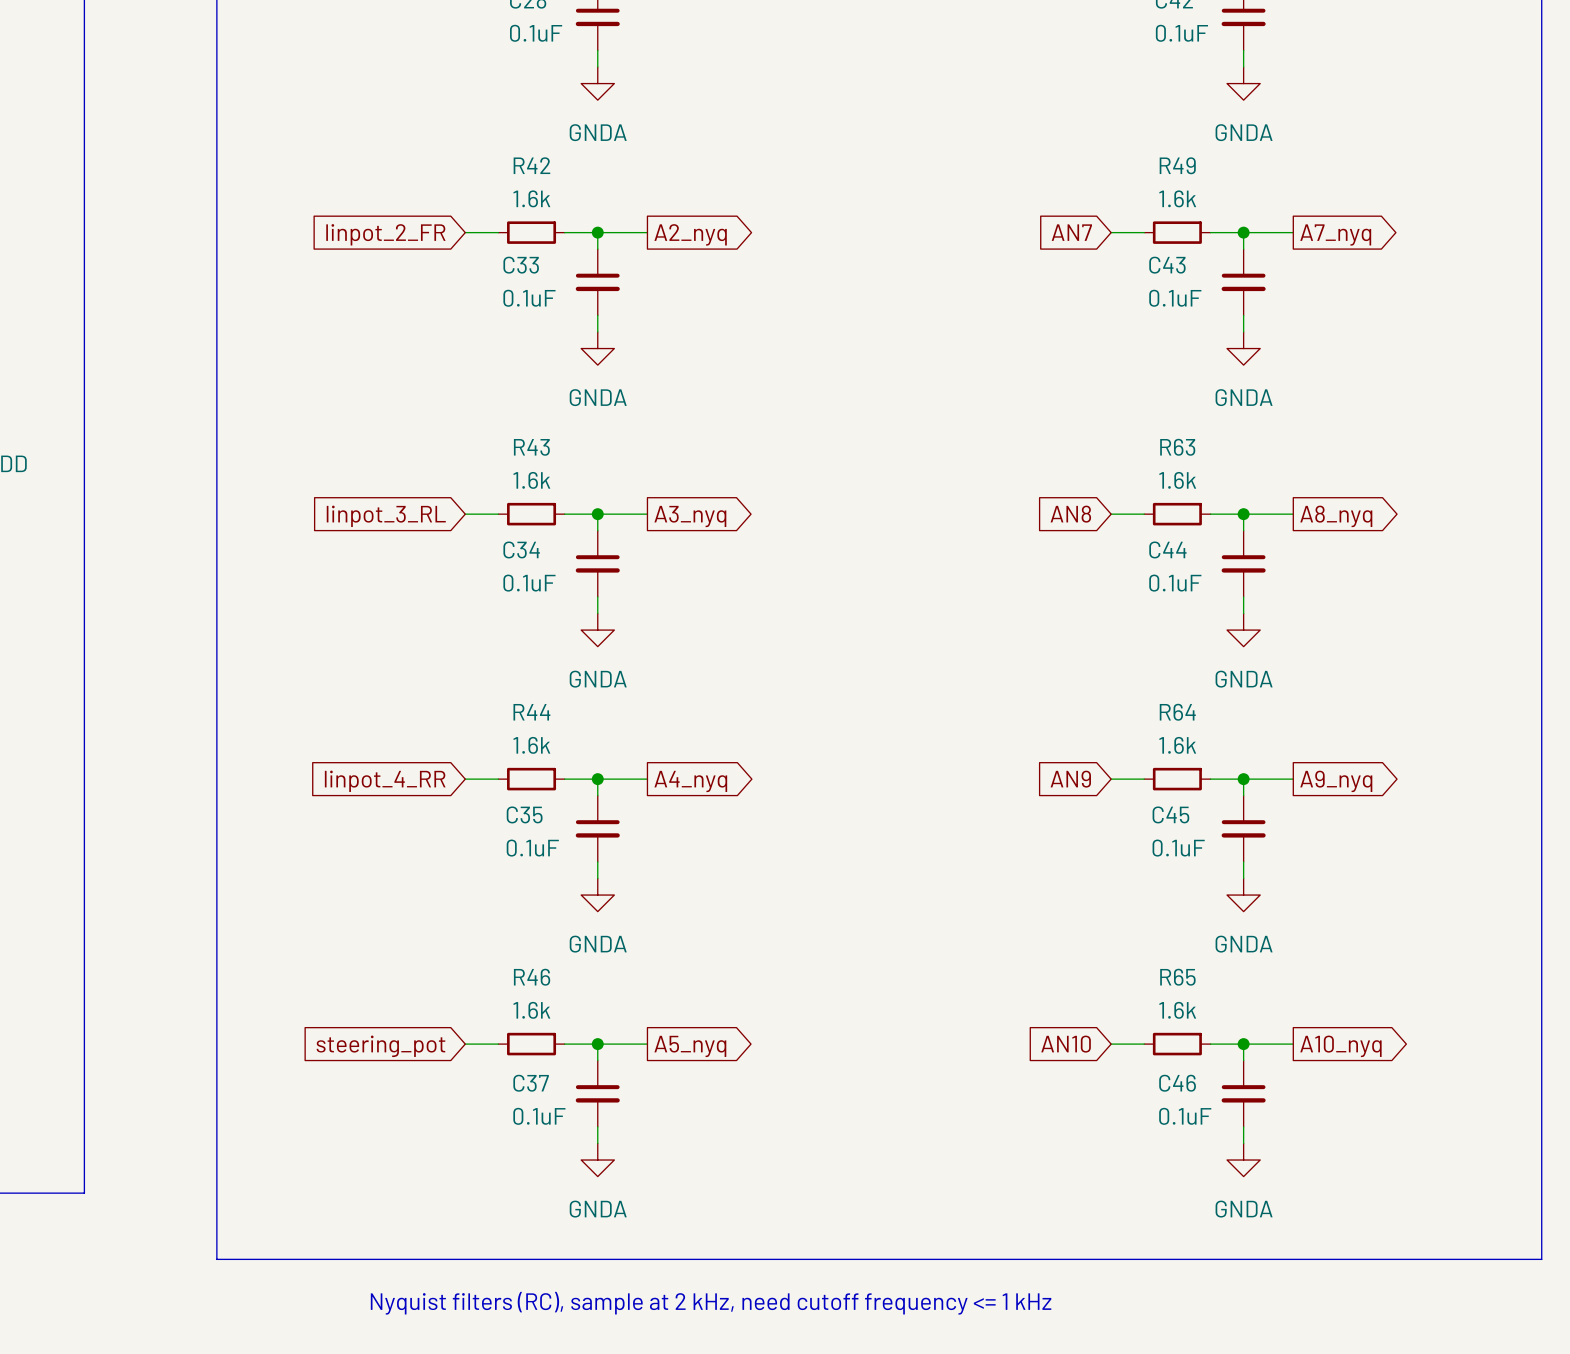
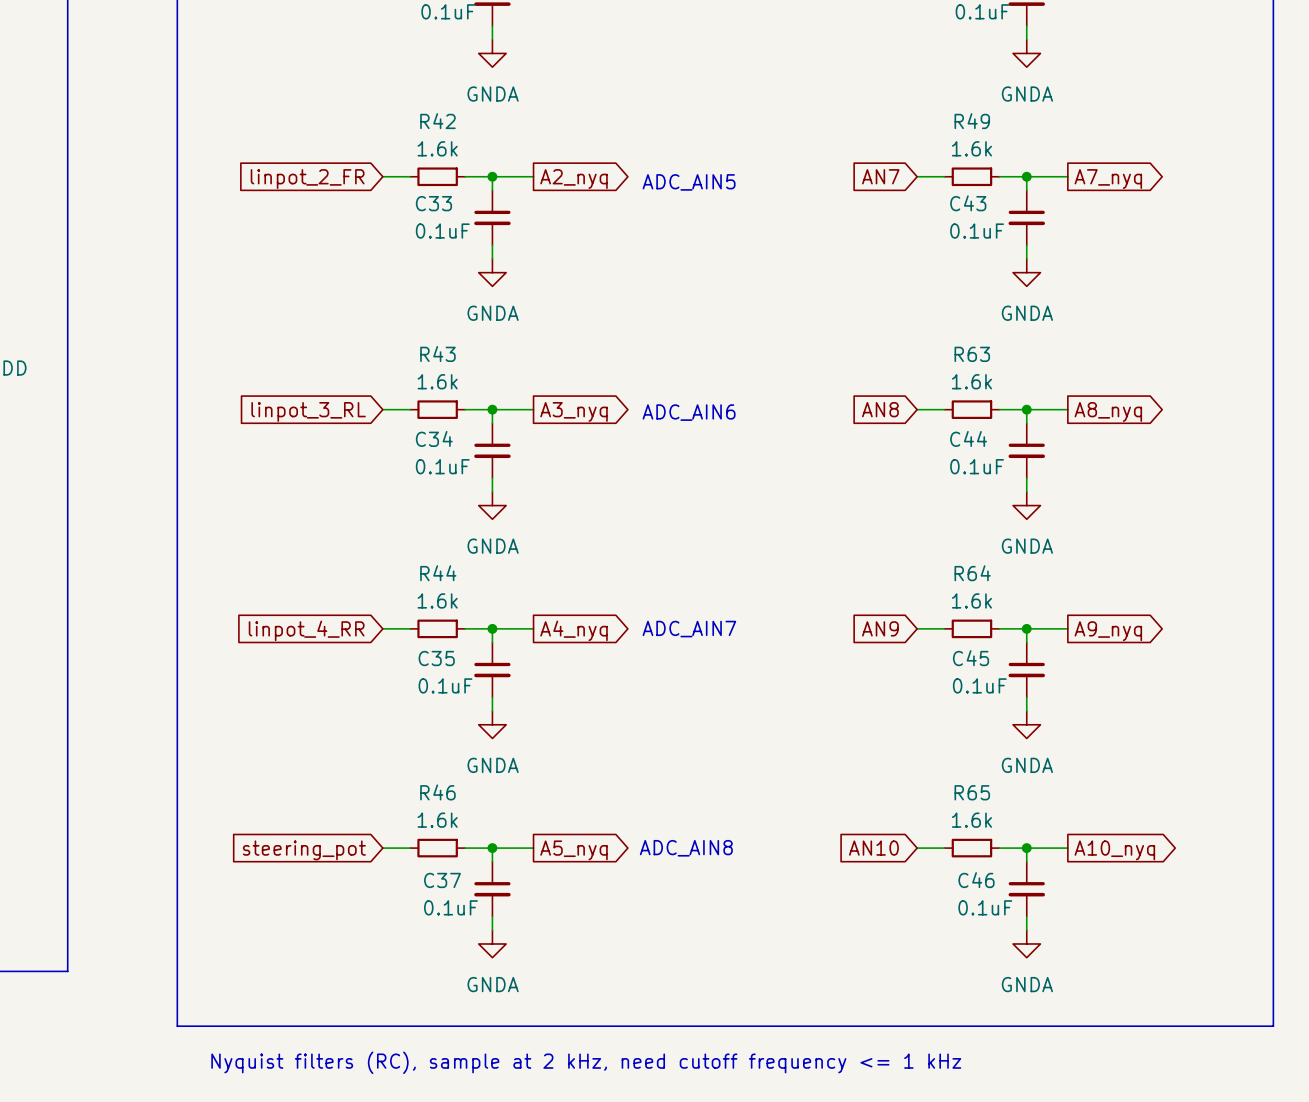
text: none -> ADC_AIN5 (689, 182)
text: none -> ADC_AIN6 (689, 412)
text: none -> ADC_AIN7 (689, 629)
text: none -> ADC_AIN8 (686, 848)

